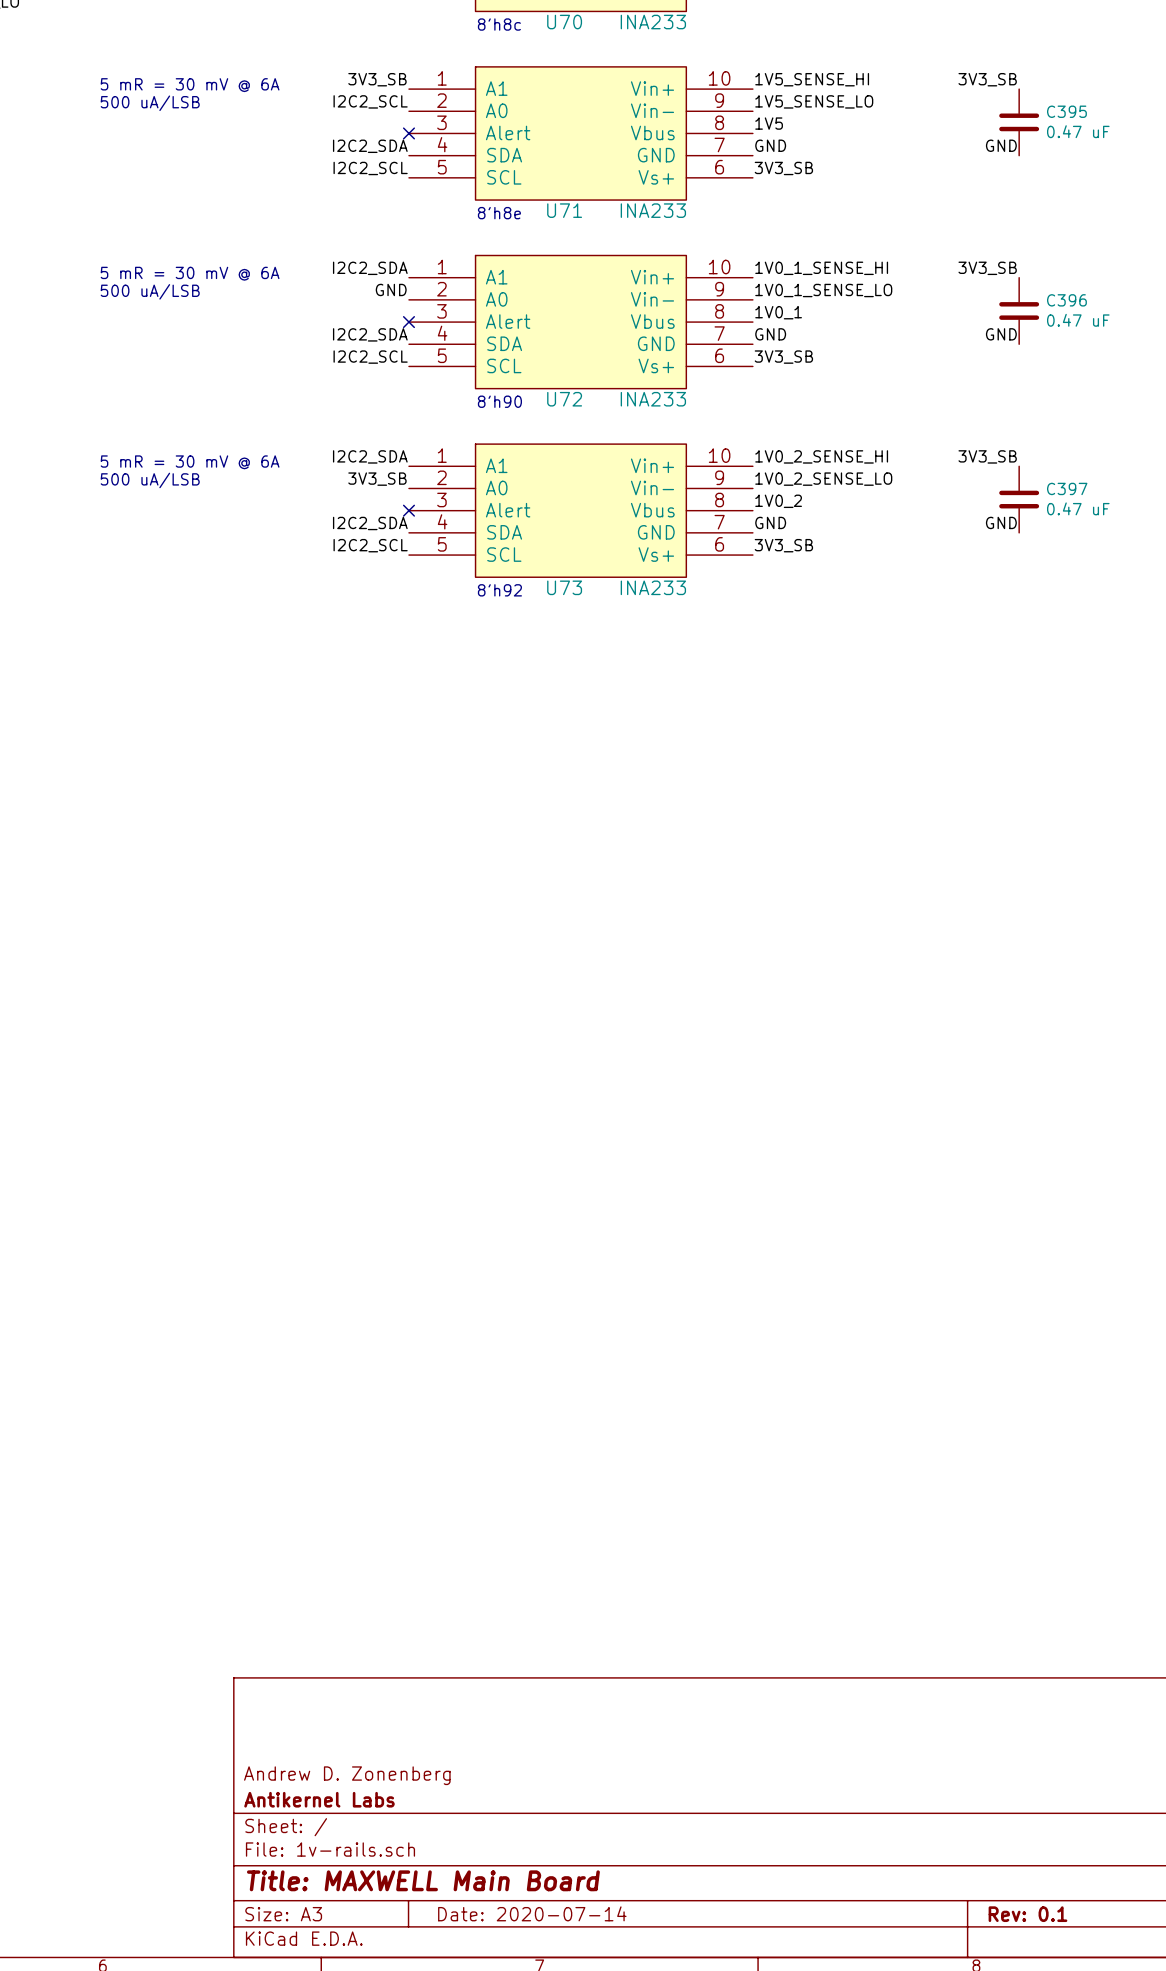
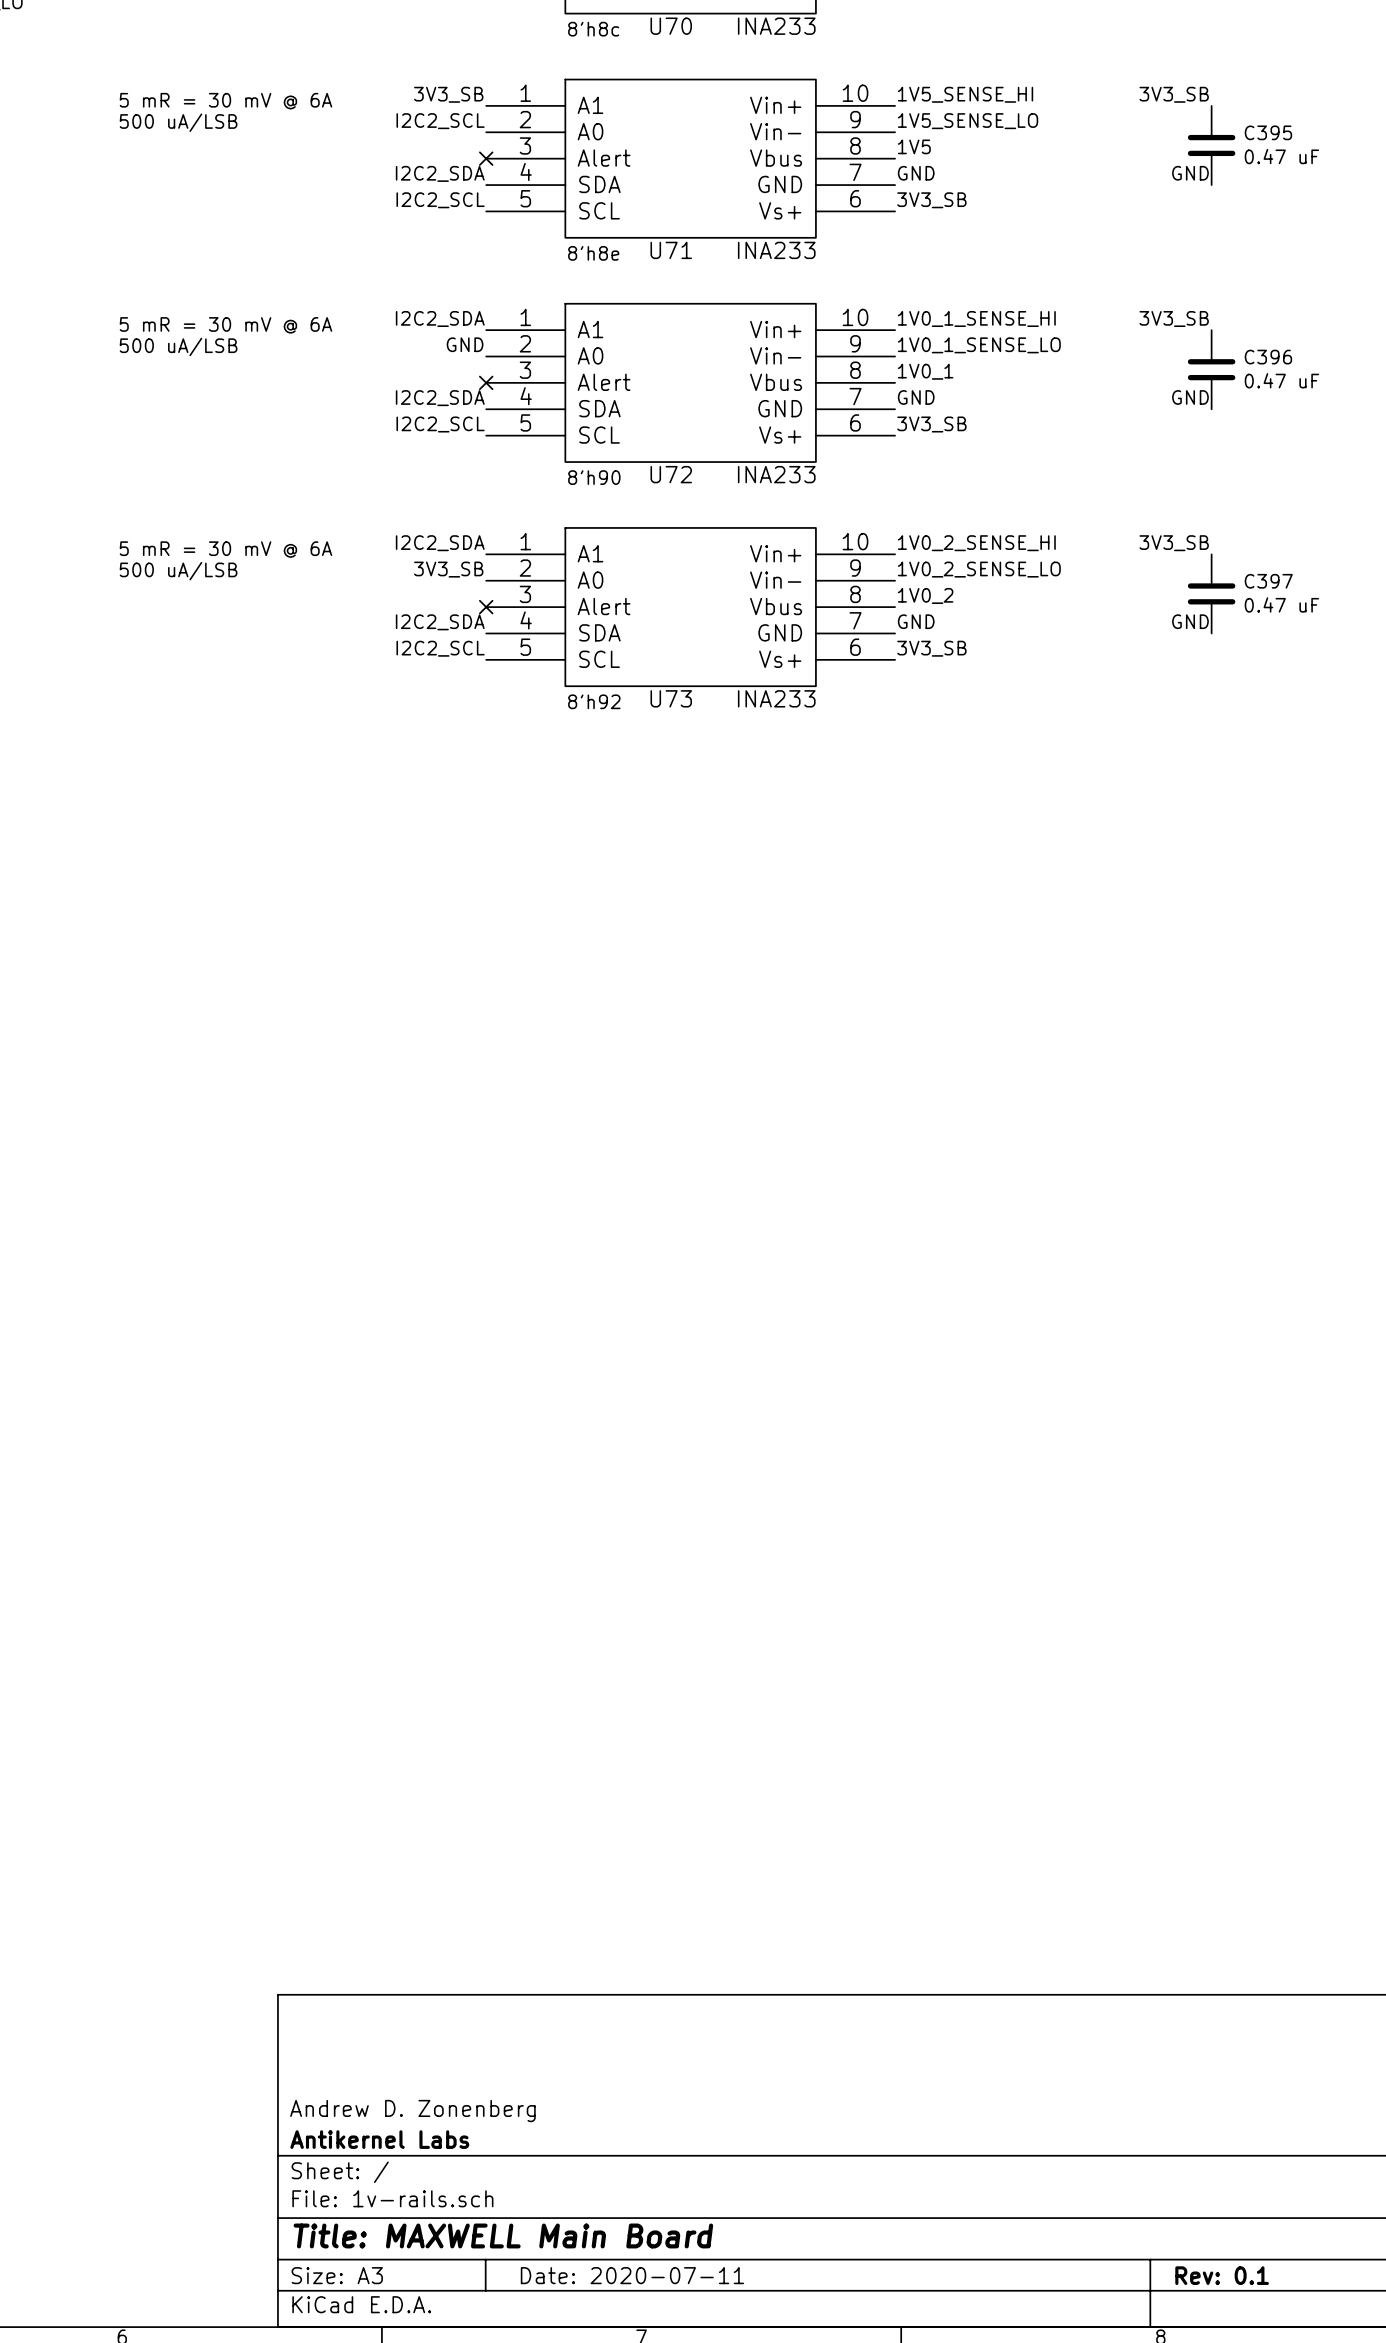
title block: Date: 2020-07-14 (532, 1913) -> Date: 2020-07-11 (632, 2275)

